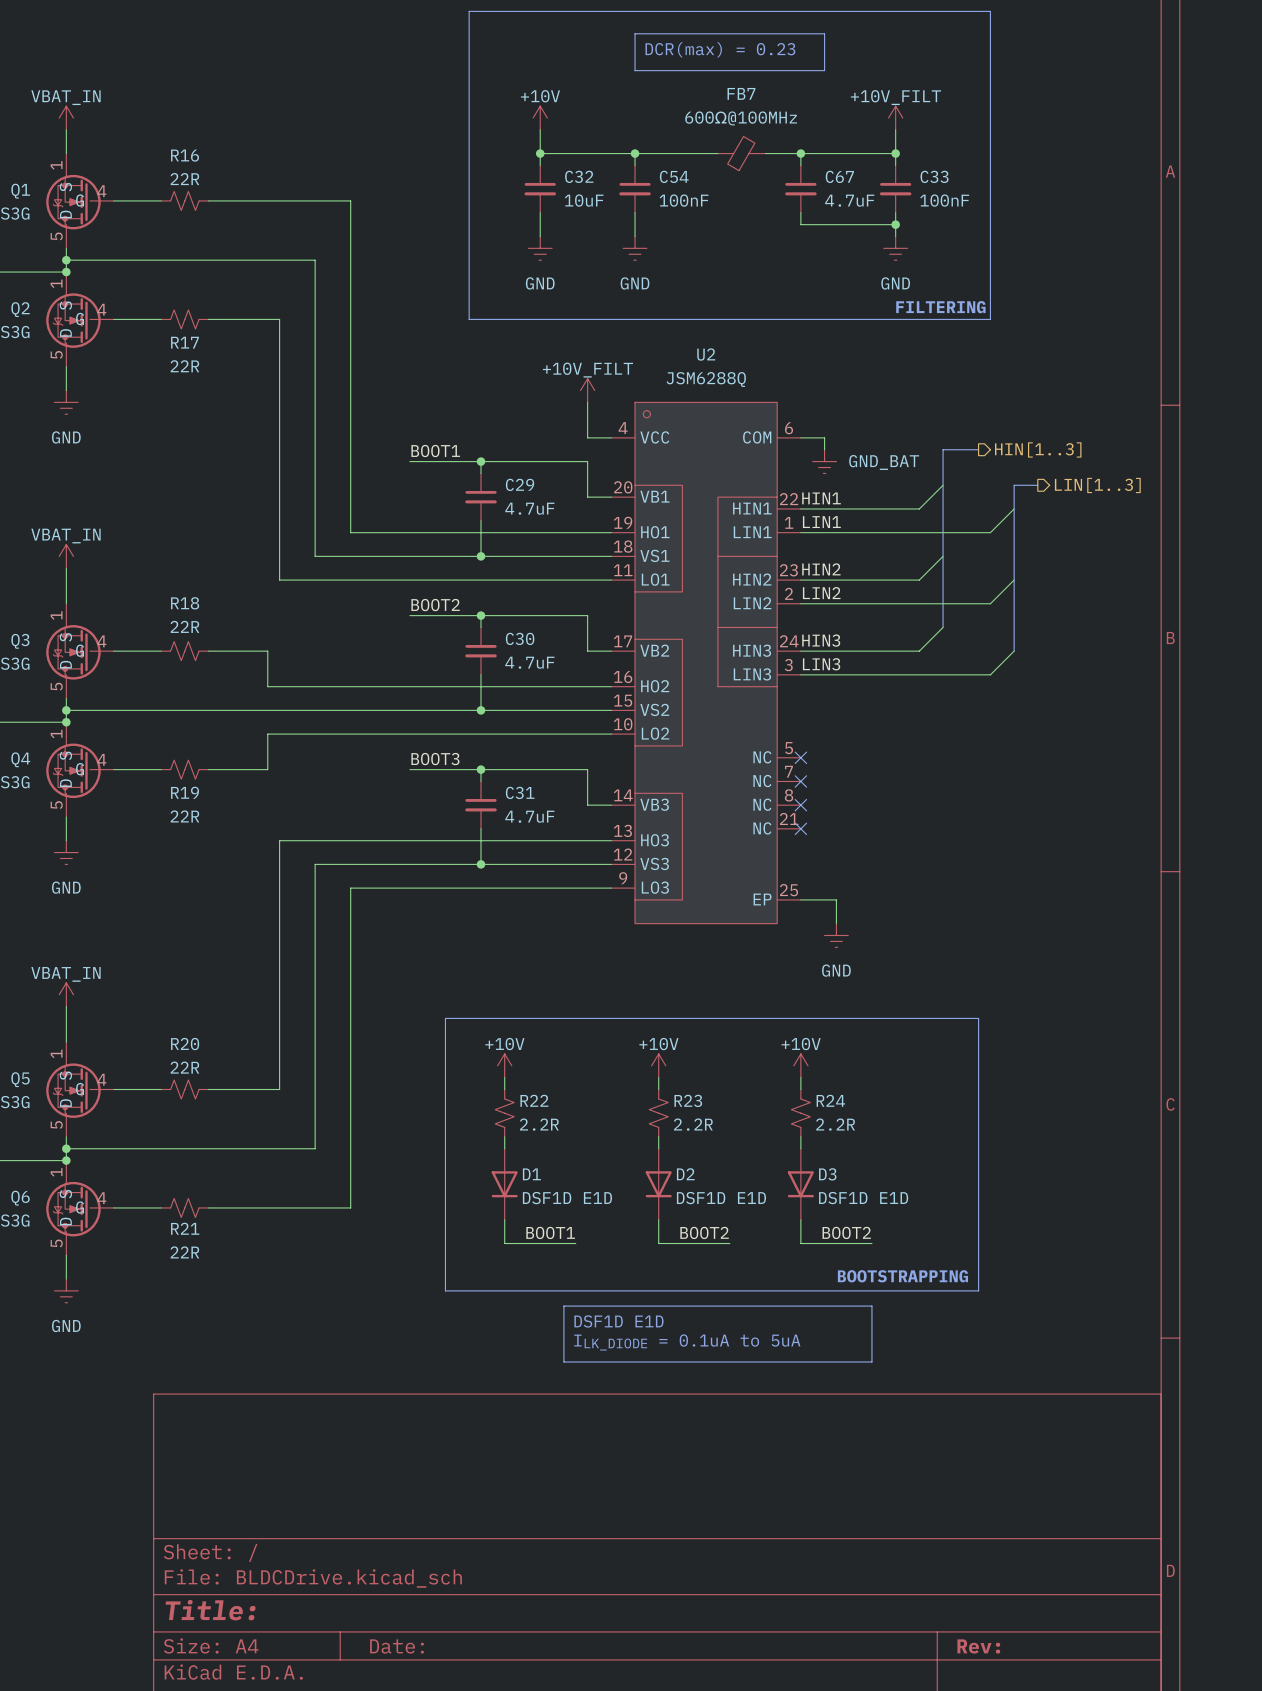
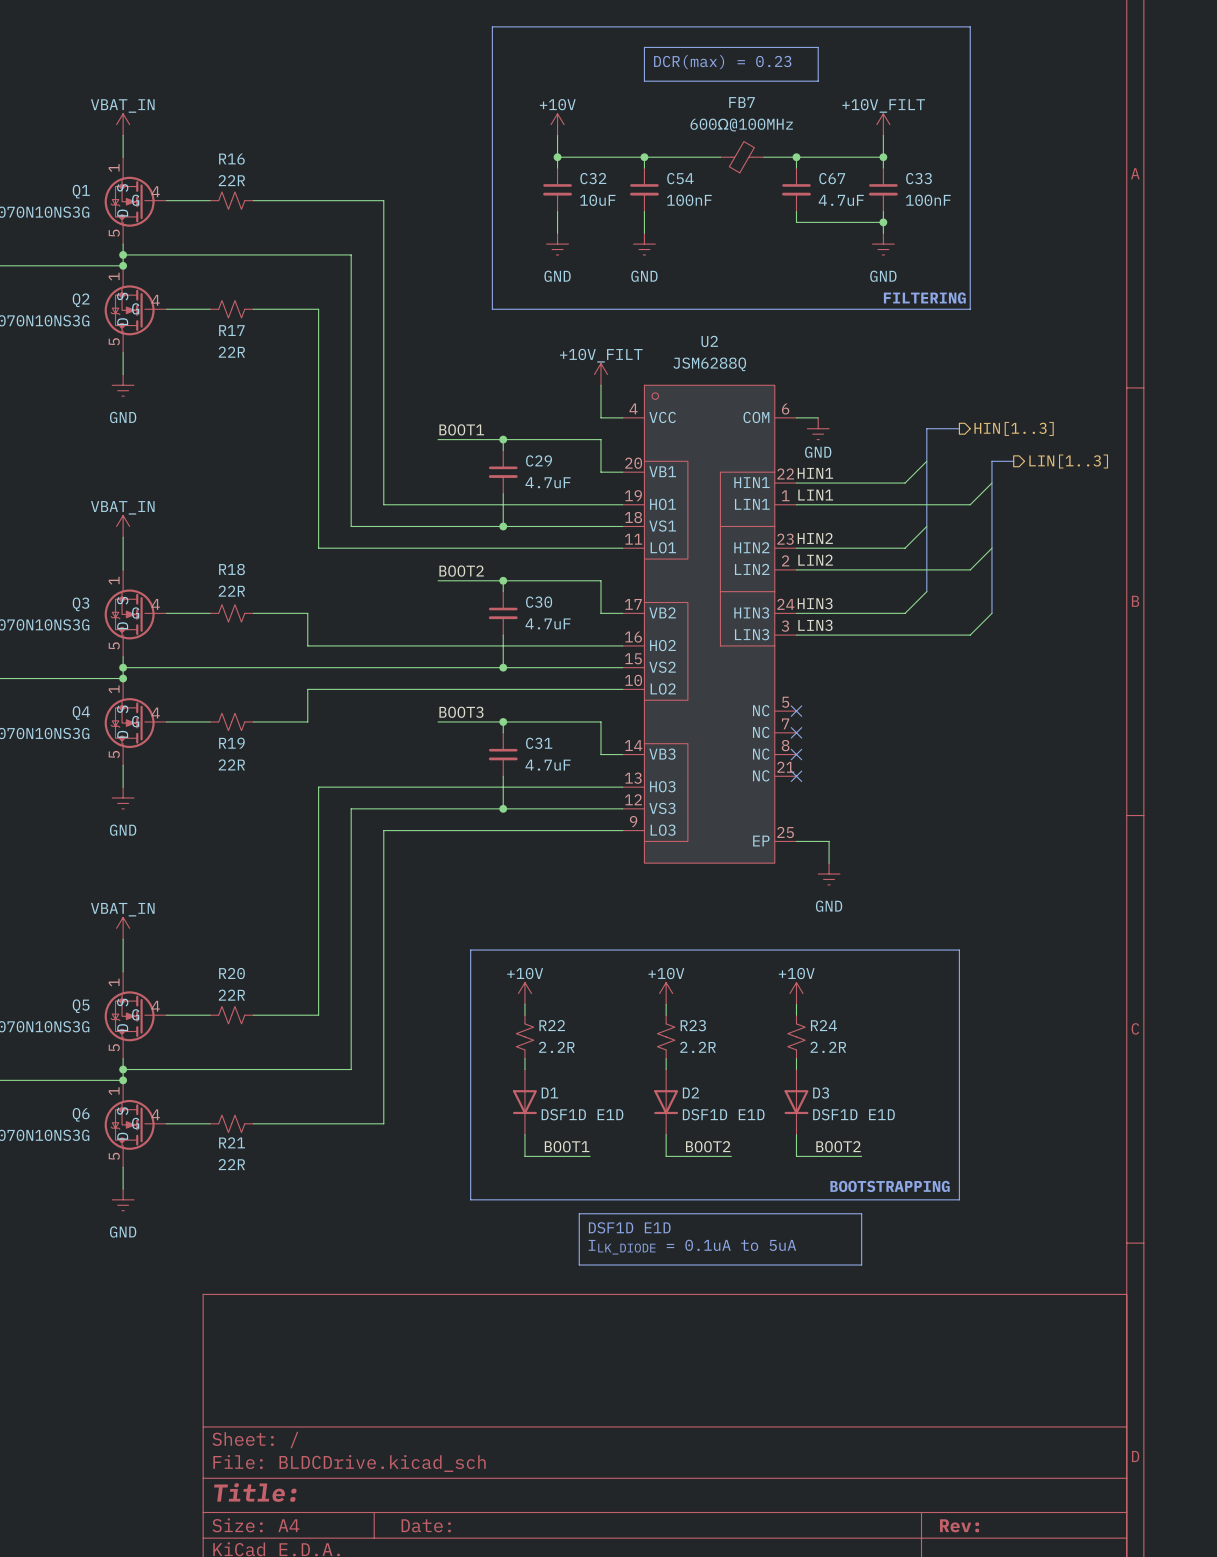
power symbol: none -> GND (818, 428)
power symbol: GND_BAT (824, 461) -> none

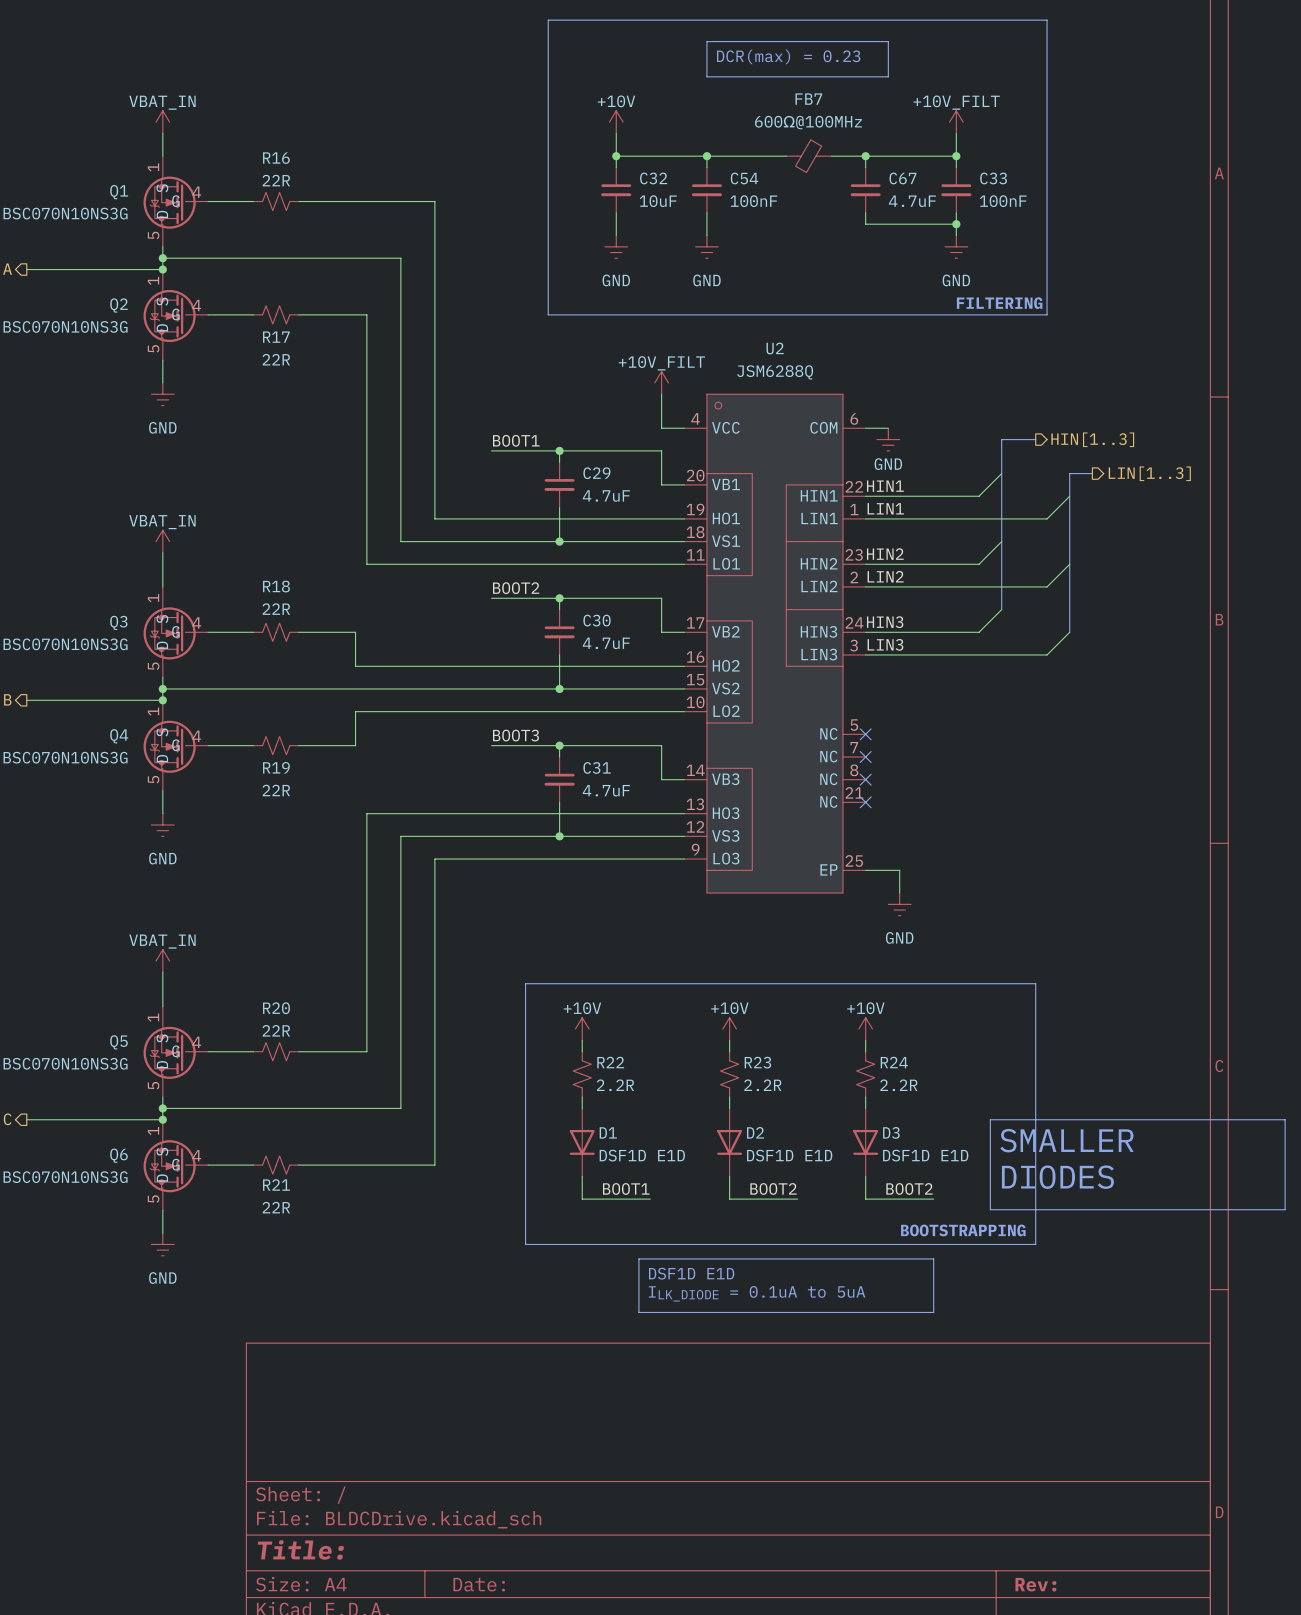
line: none -> (990, 1119) (1285, 1119) (1285, 1209) (990, 1209) (990, 1119)
text: none -> SMALLER (1066, 1140)
text: none -> DIODES (1057, 1177)

